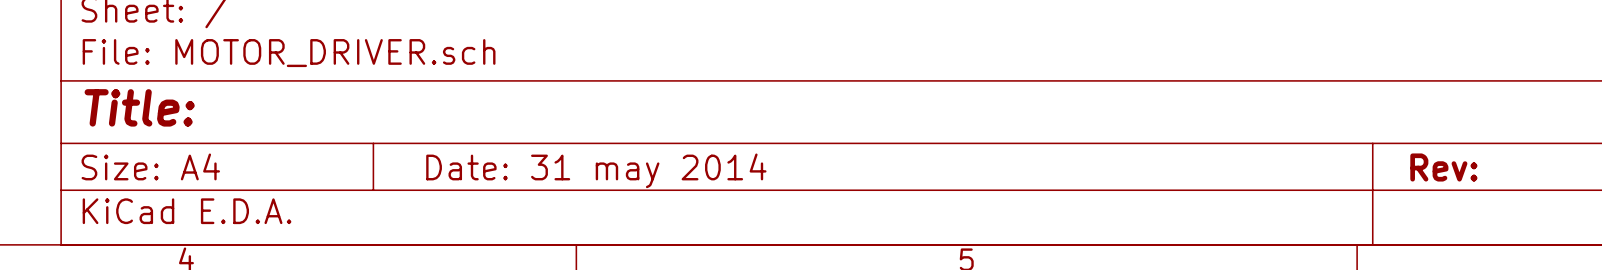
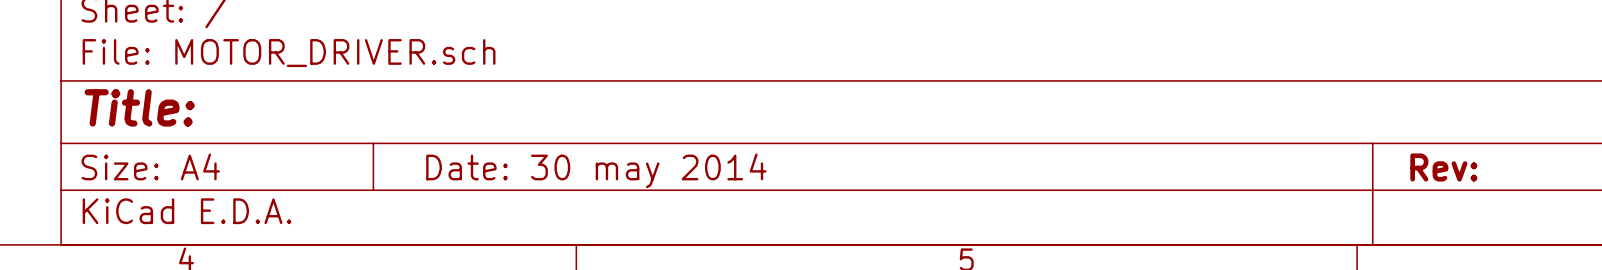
title block: Date: 31 may 2014 (596, 170) -> Date: 30 may 2014 (596, 170)

